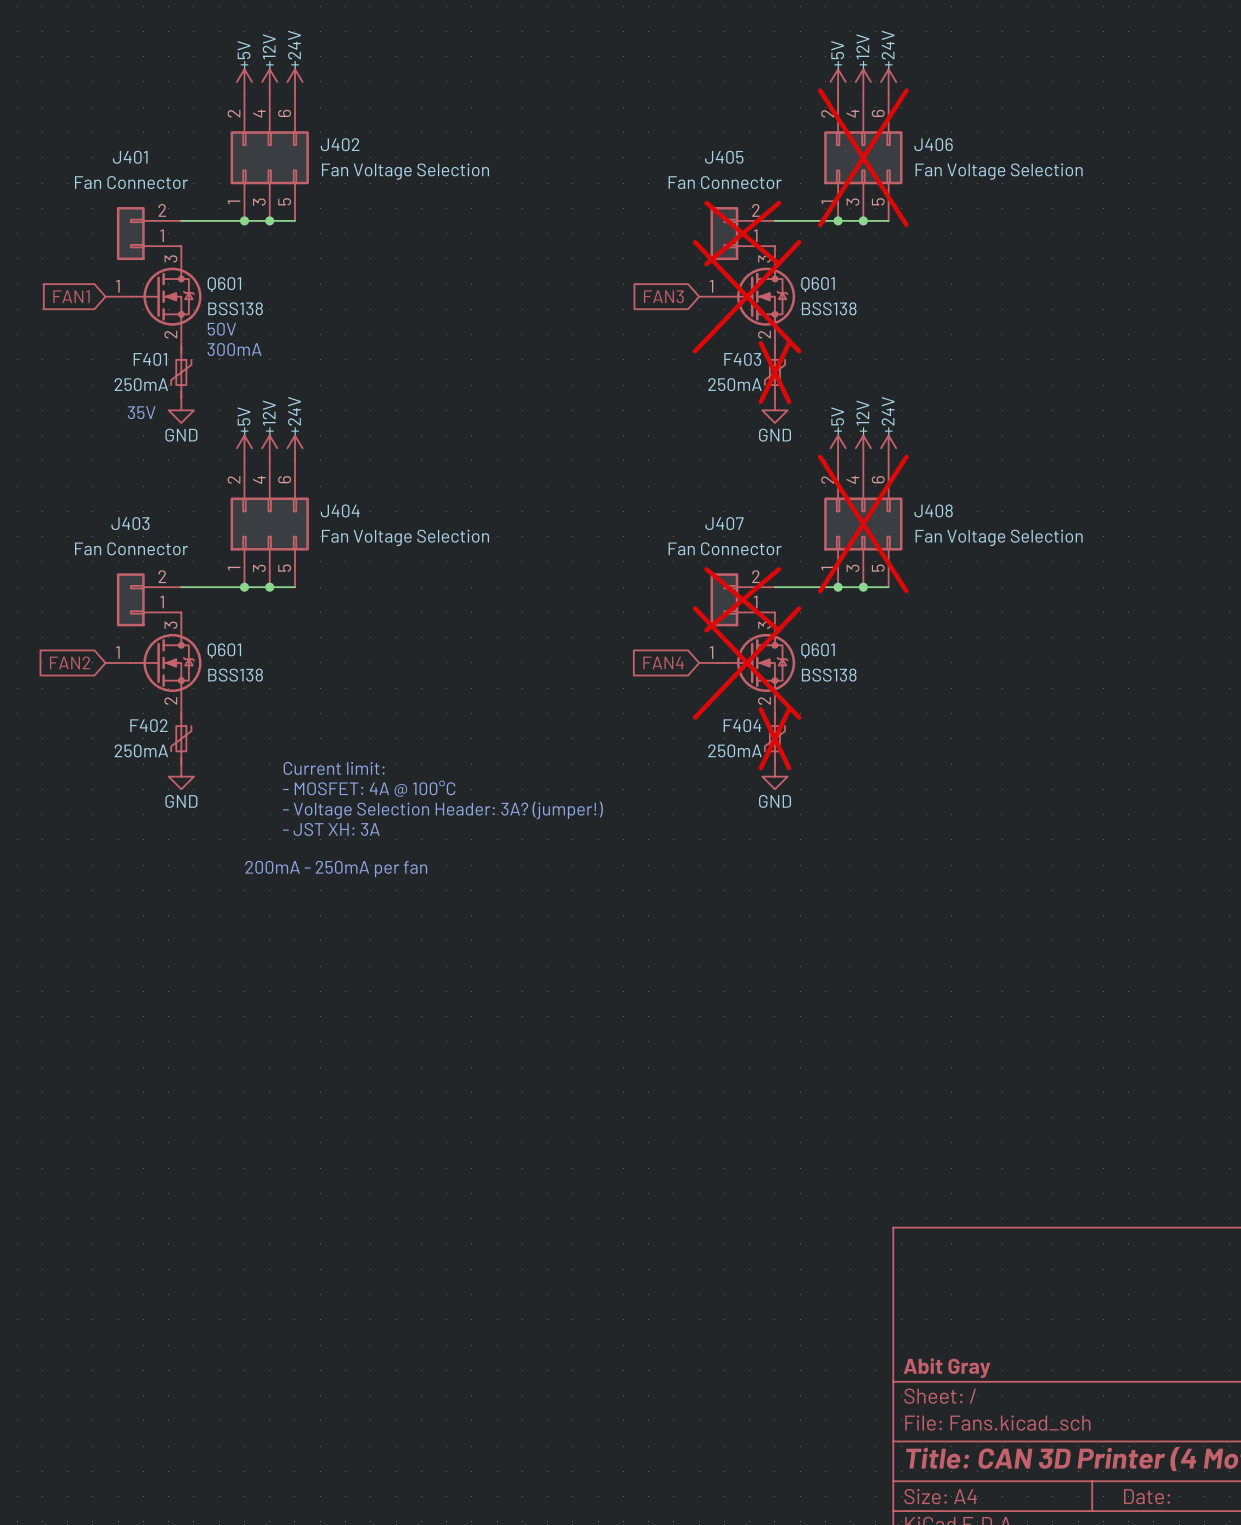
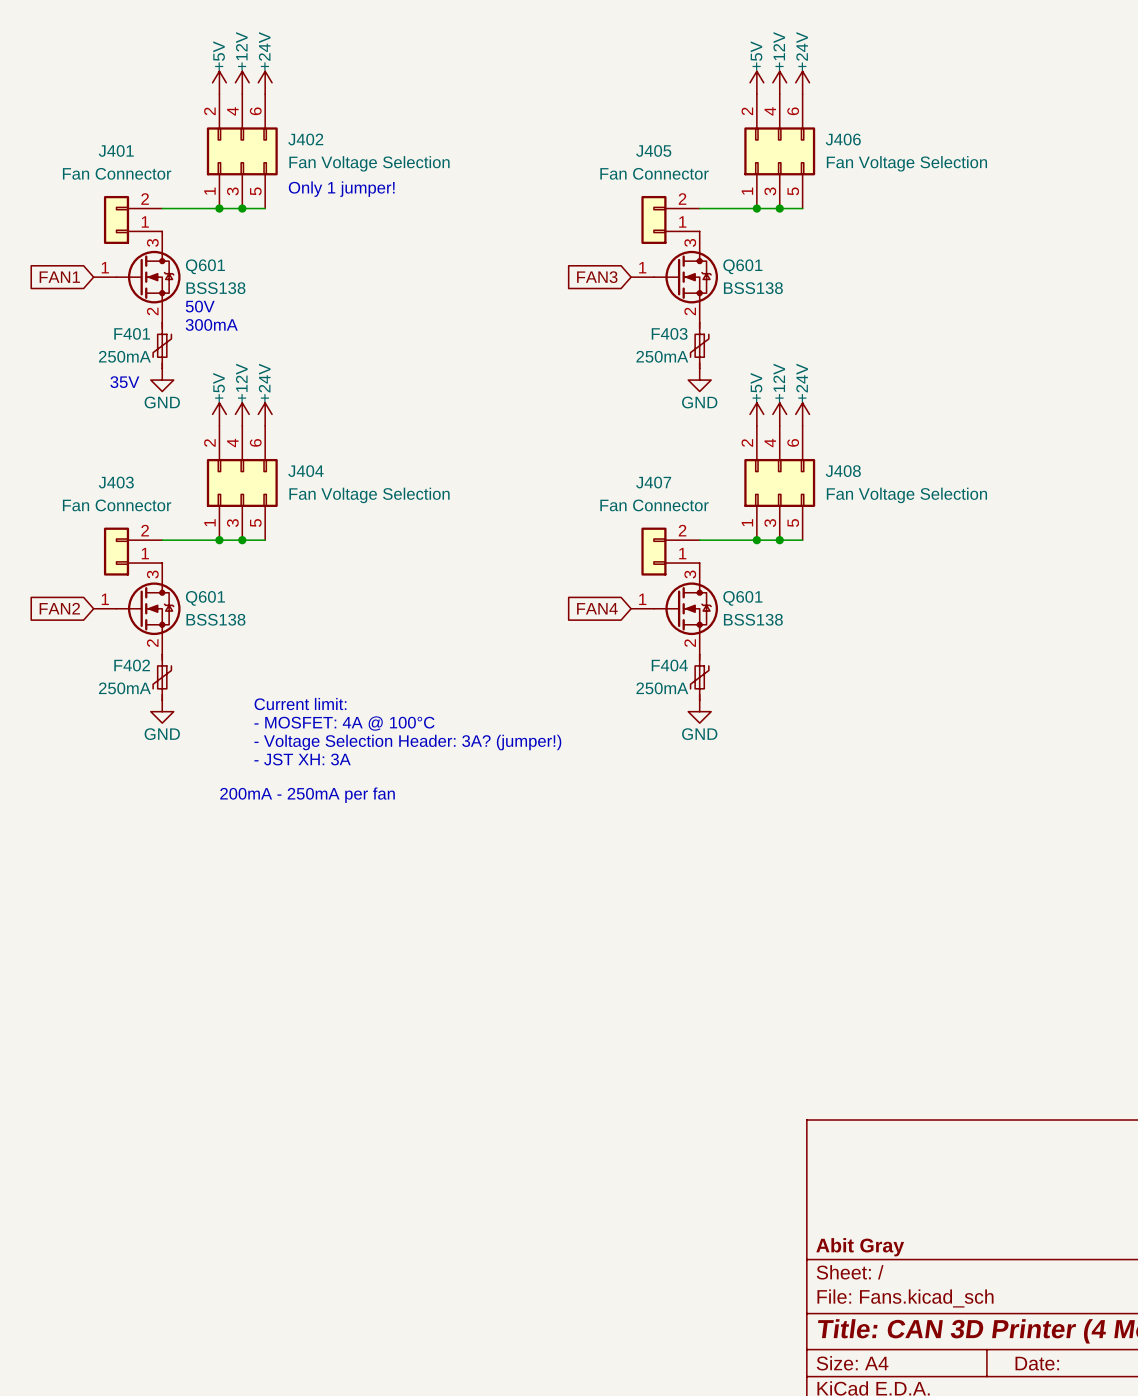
J406 do-not-place cross: (863, 157) -> none
text: none -> Only 1 jumper! (341, 189)
J405 do-not-place cross: (742, 233) -> none
Q601 do-not-place cross: (747, 296) -> none
F403 do-not-place cross: (774, 372) -> none
J408 do-not-place cross: (863, 524) -> none
J407 do-not-place cross: (742, 599) -> none
Q601 do-not-place cross: (747, 662) -> none
F404 do-not-place cross: (774, 738) -> none

